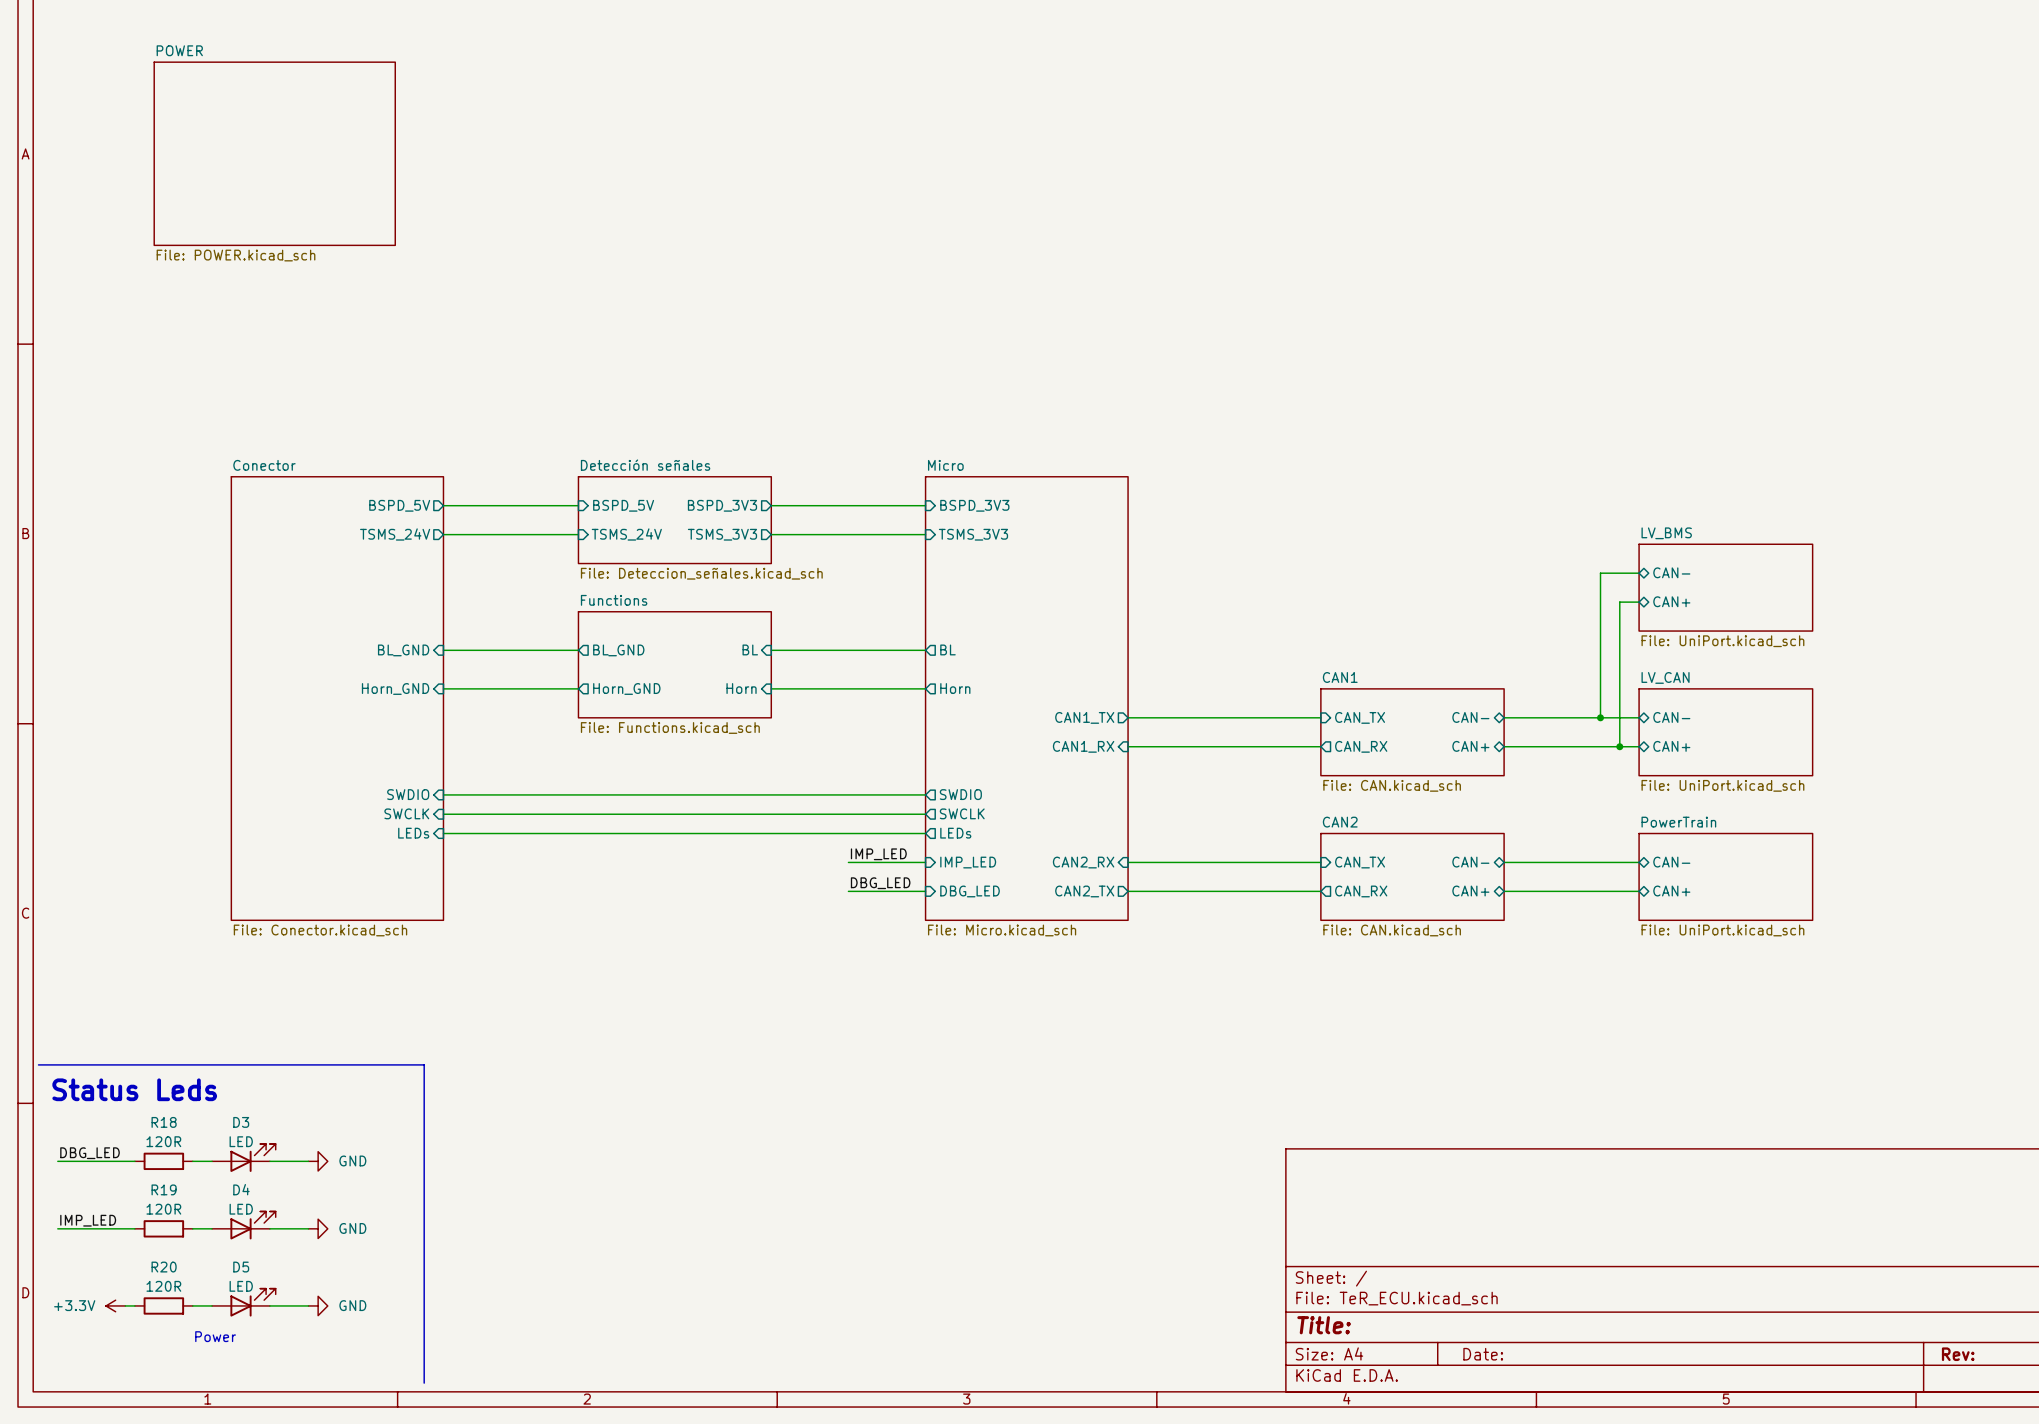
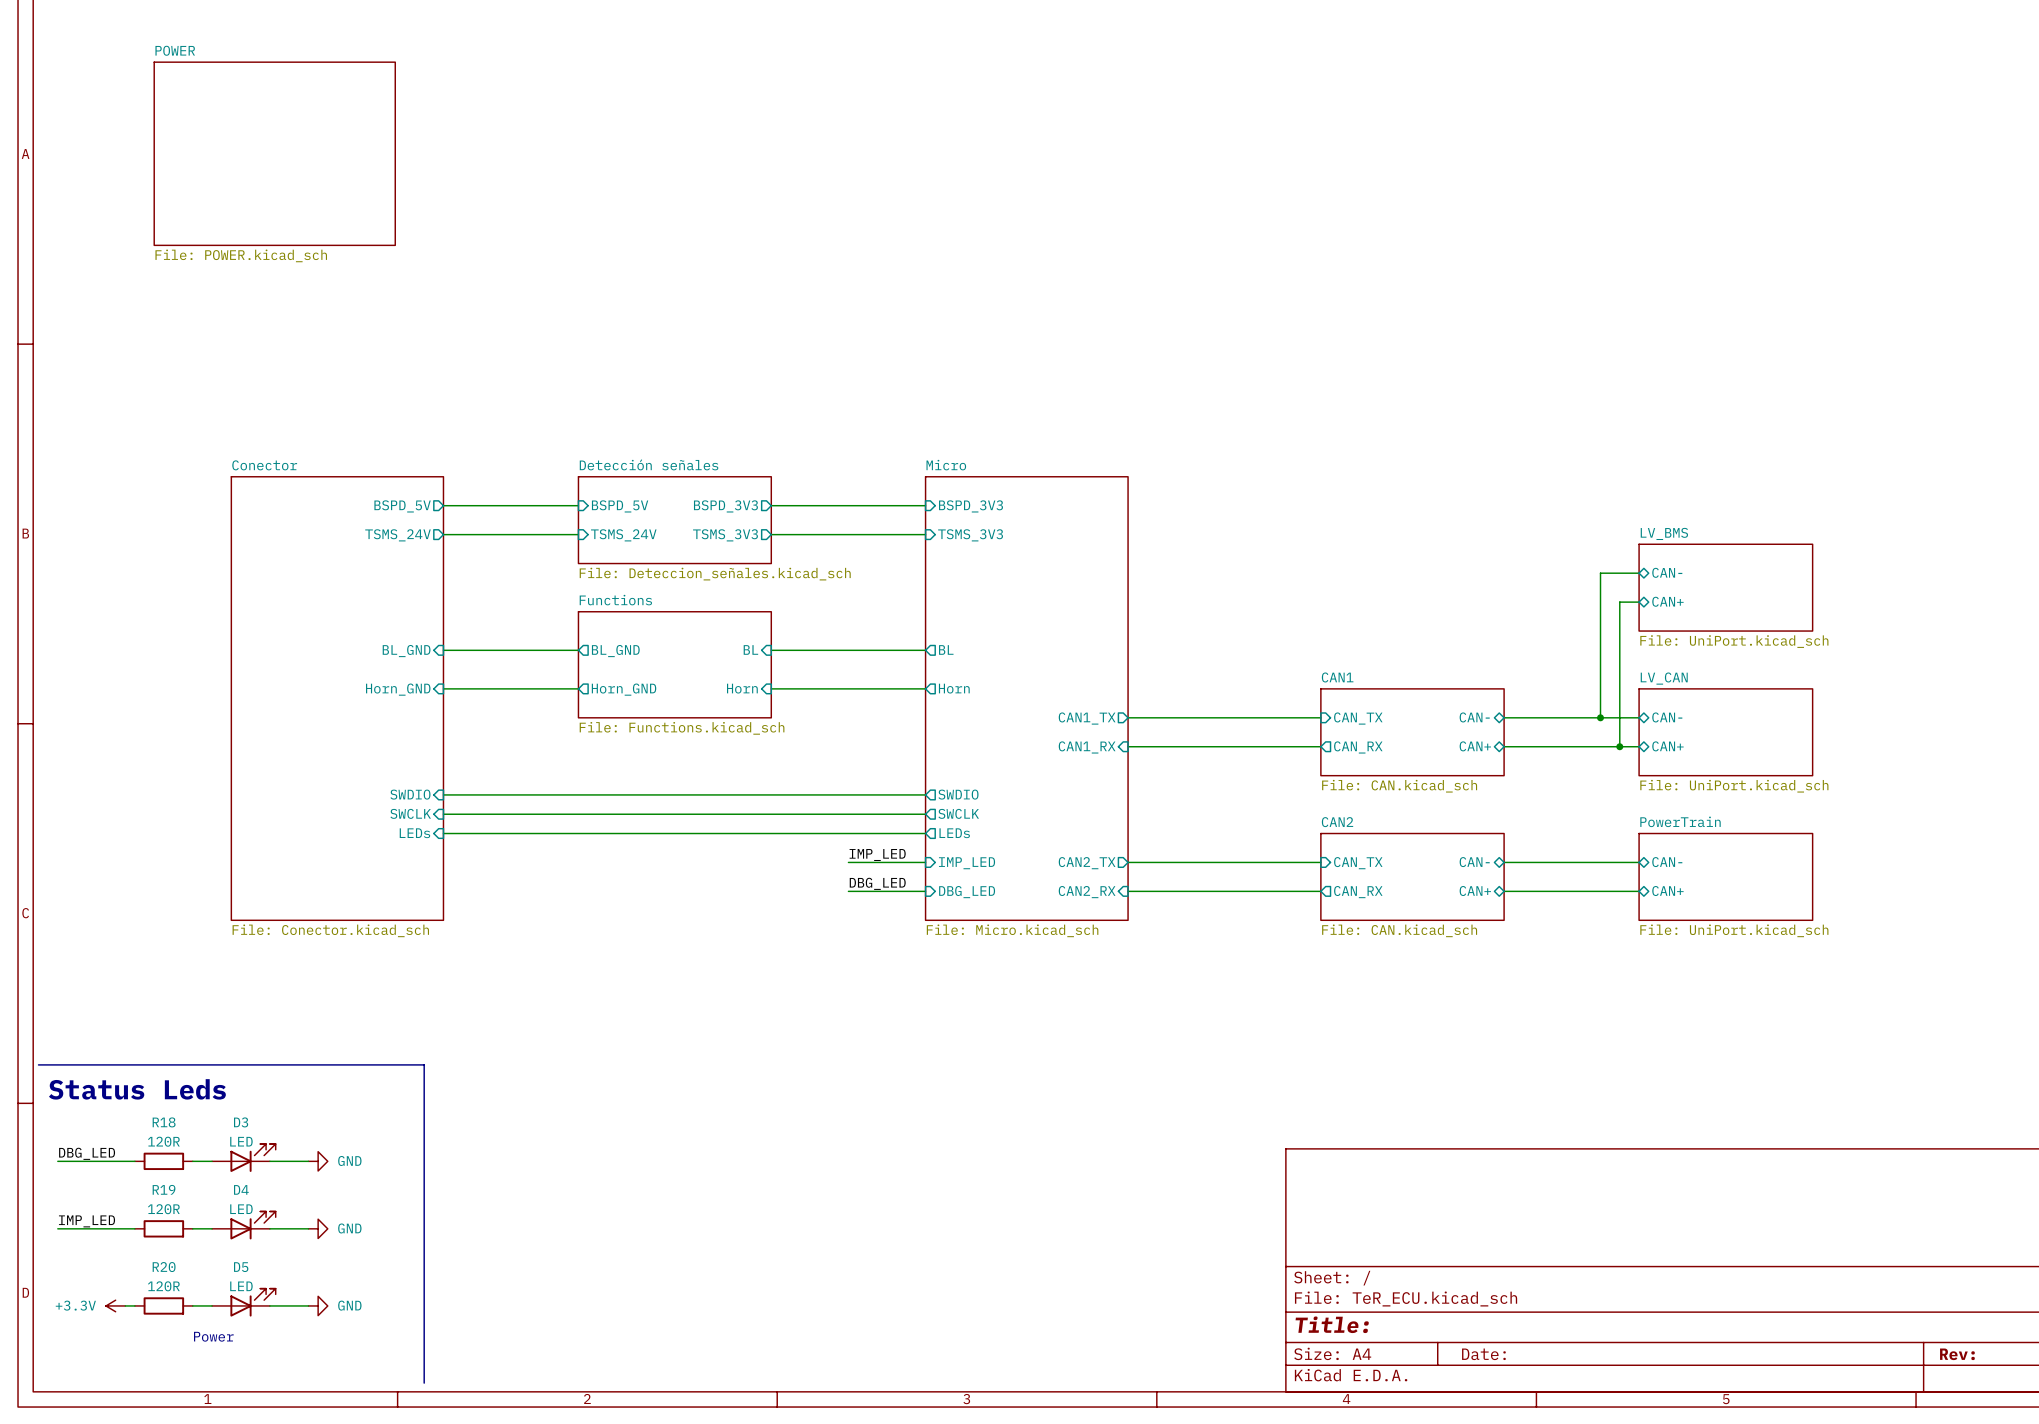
sheet pin shape: input (1083, 862) -> output (1087, 863)
sheet pin: CAN2_RX (1083, 862) -> CAN2_TX (1087, 863)
sheet pin shape: output (1084, 891) -> input (1087, 892)
sheet pin: CAN2_TX (1084, 891) -> CAN2_RX (1087, 892)

